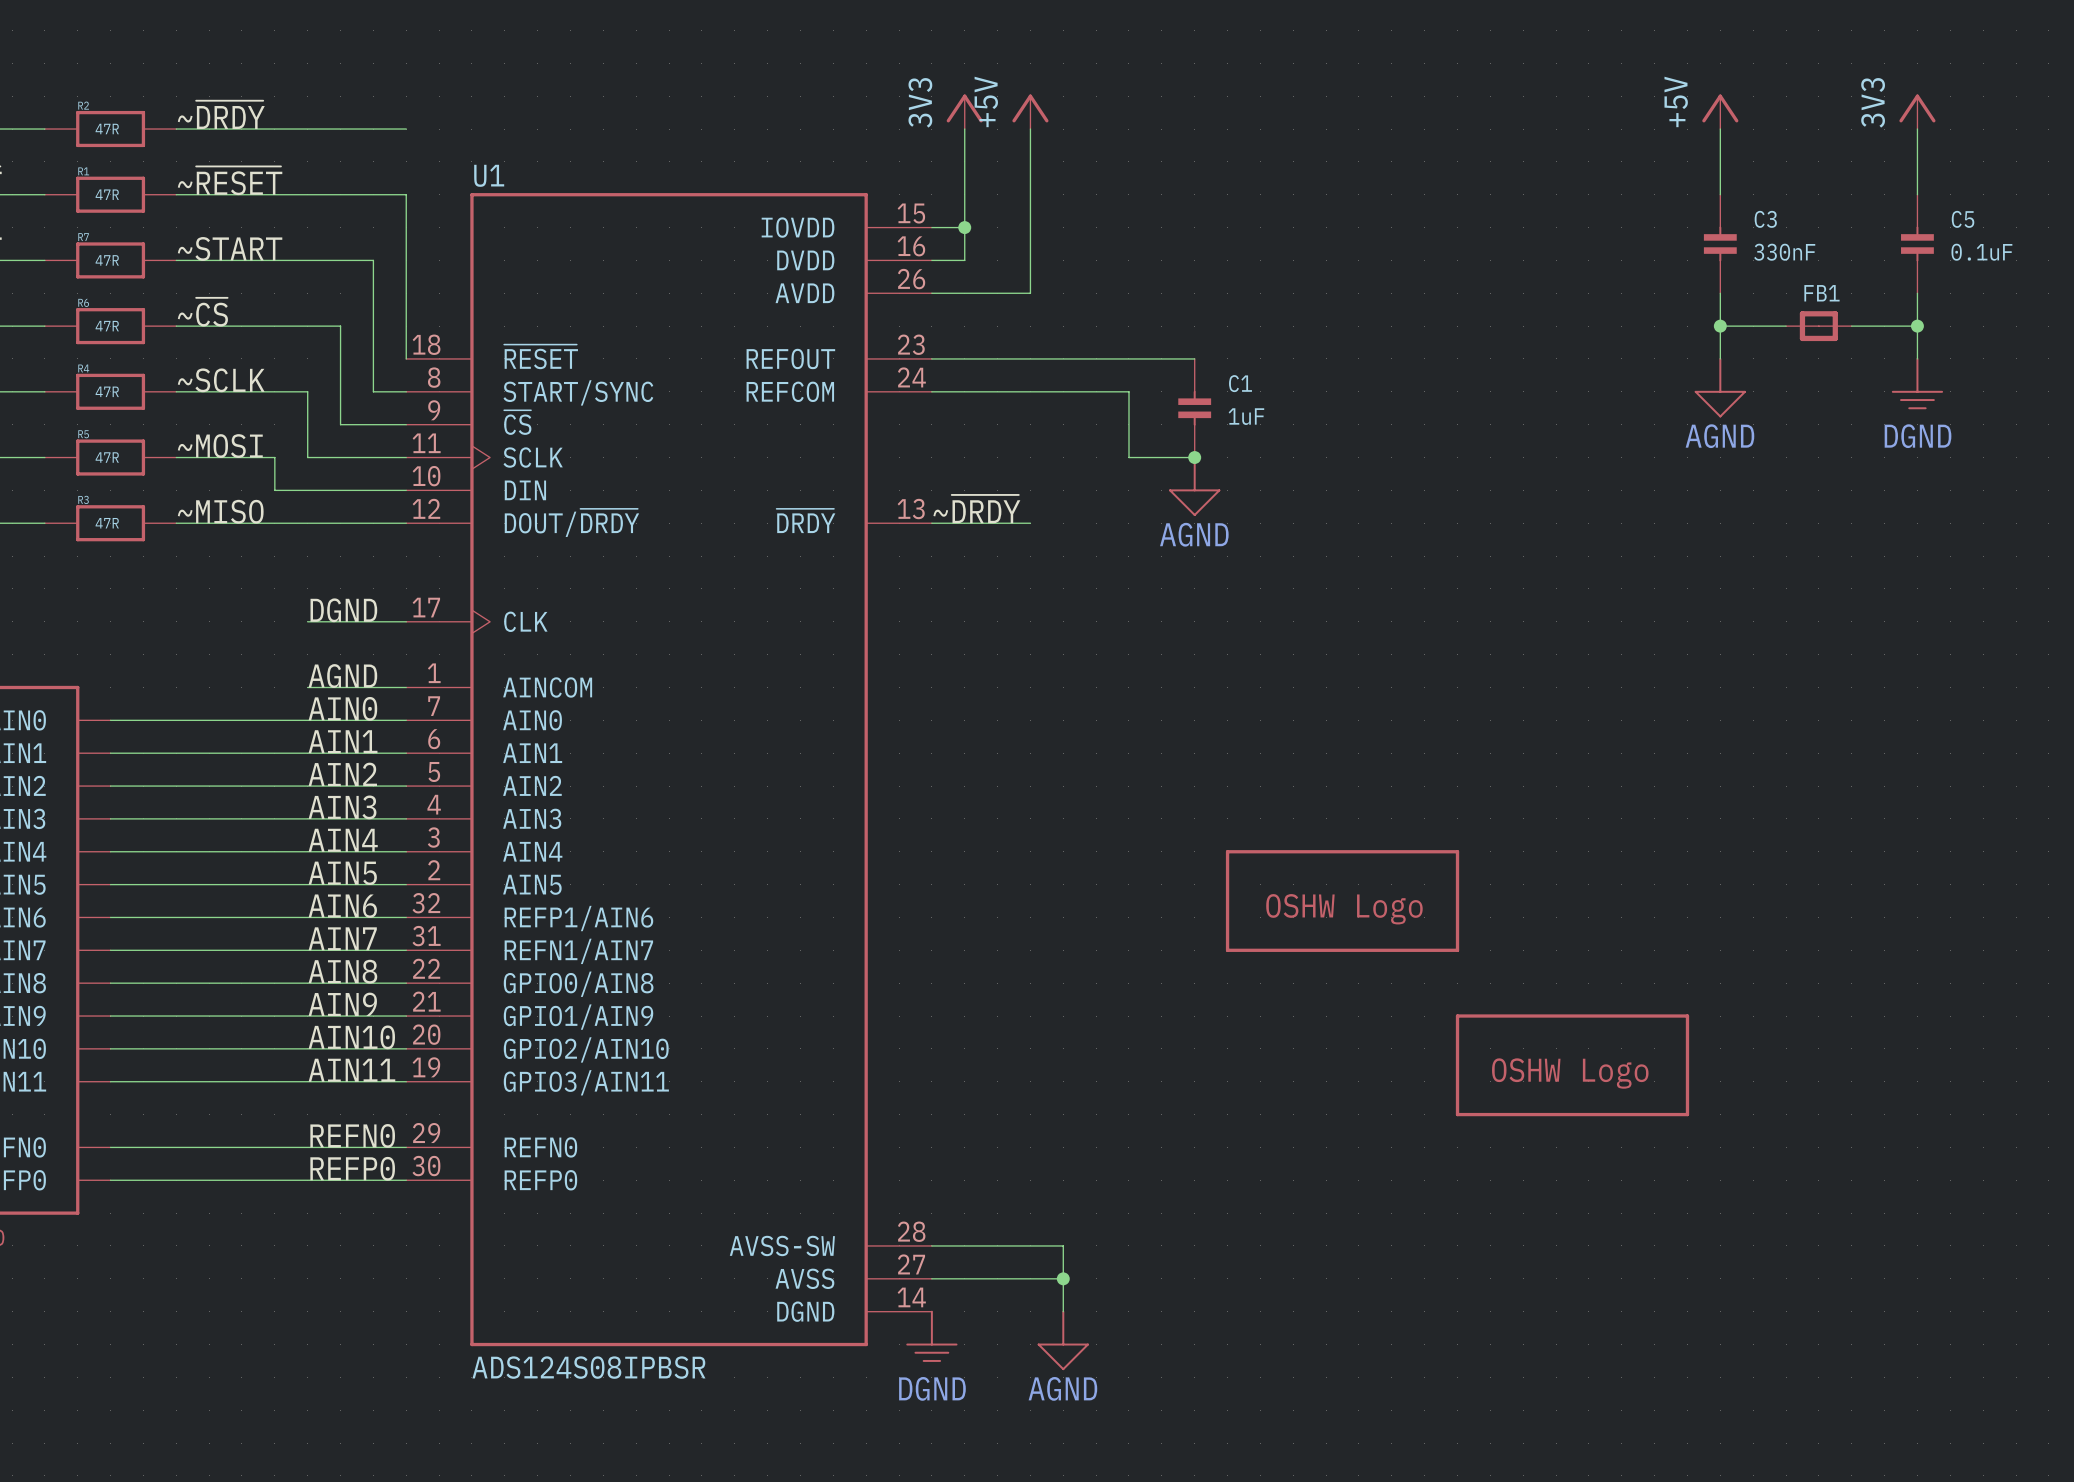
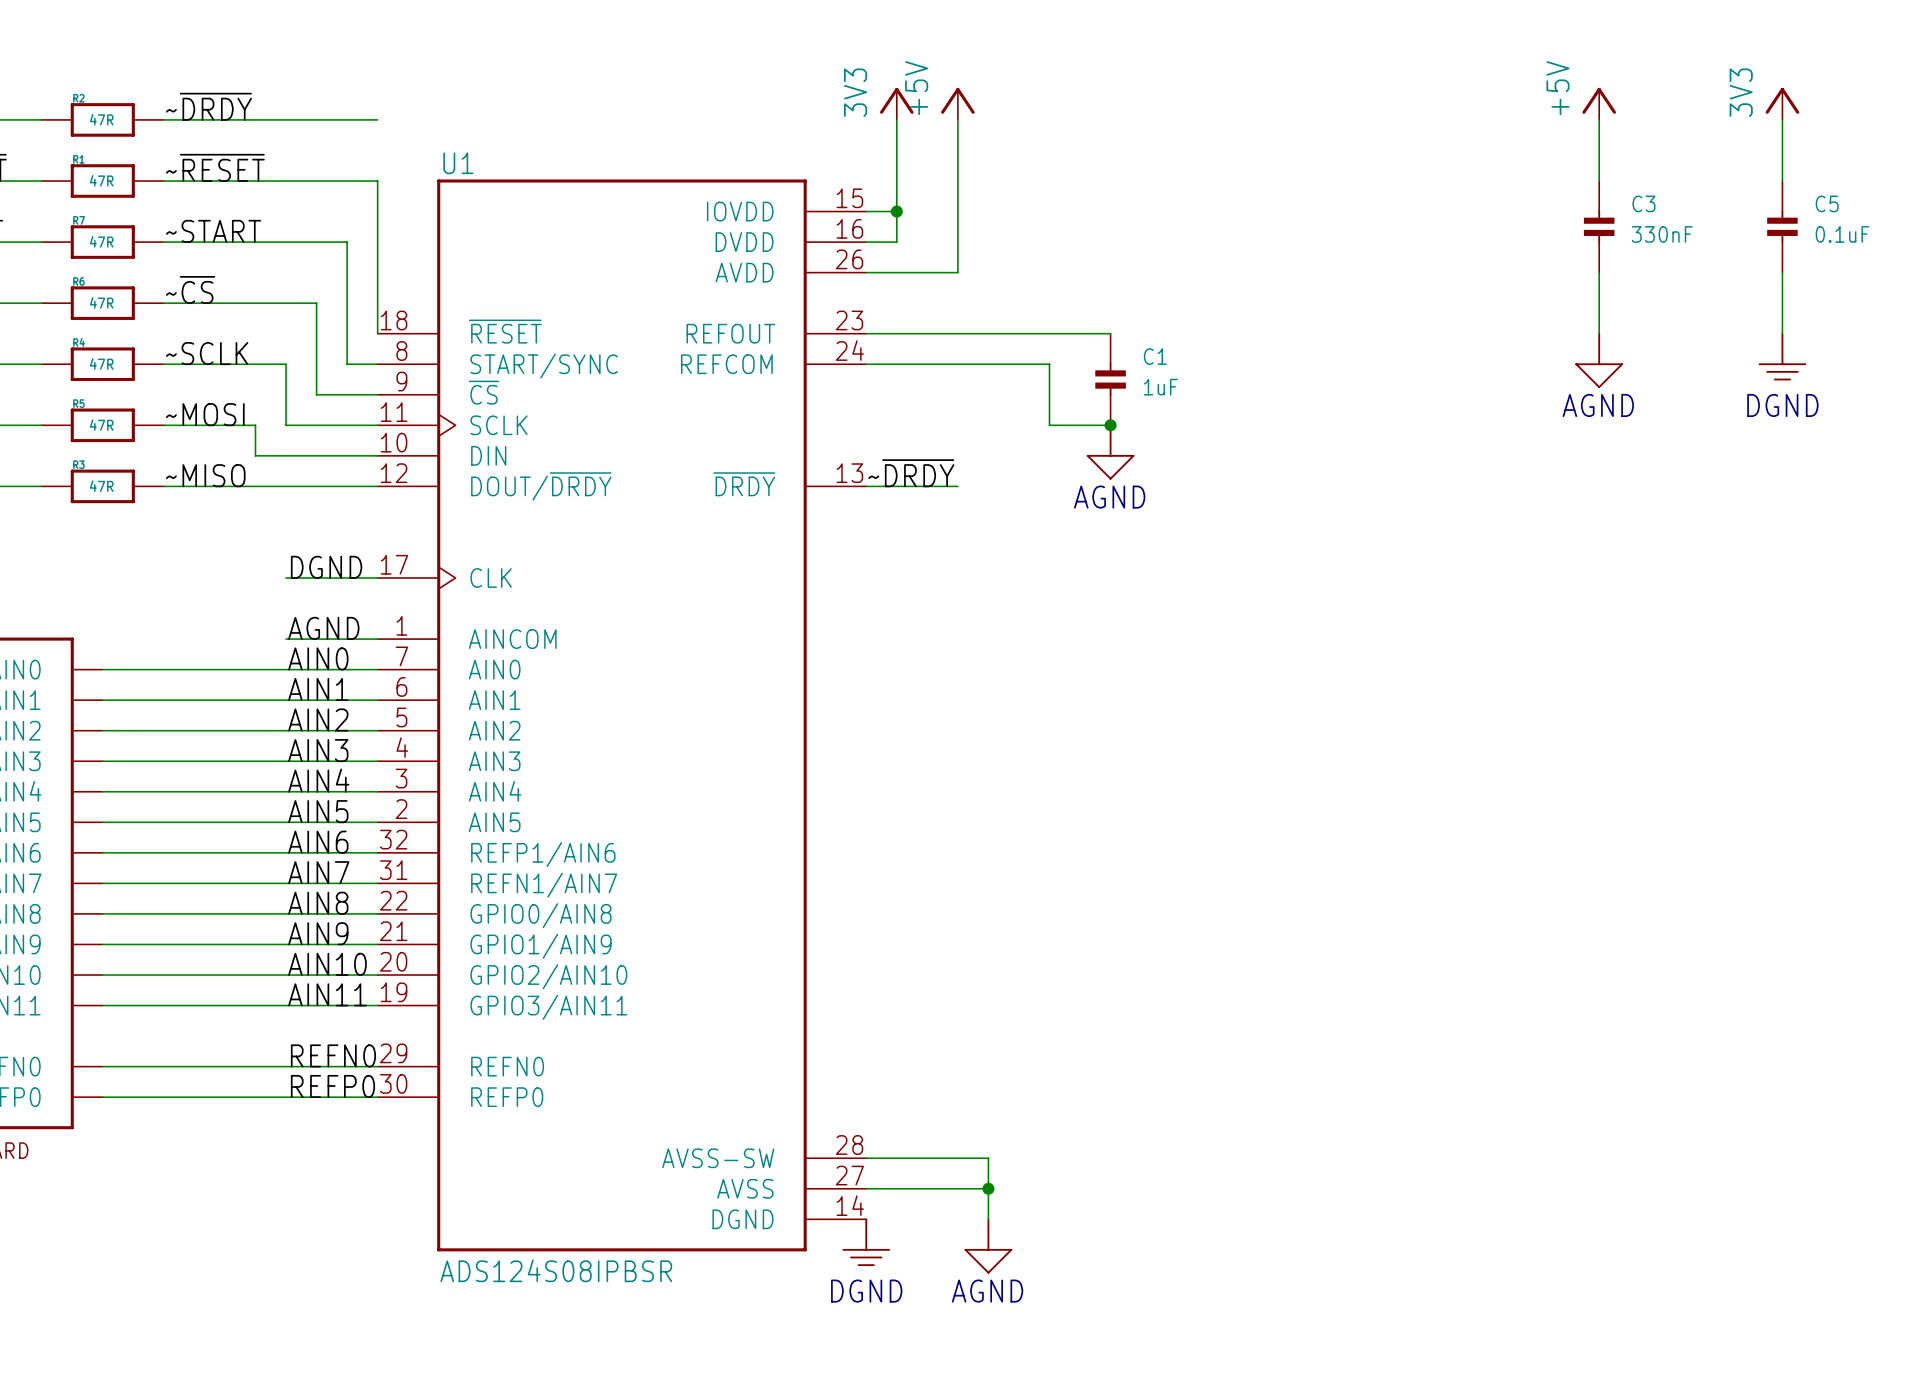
wire: (1720, 326) (1786, 326) -> none
junction: (1720, 326) -> none
FB1: (1818, 326) -> none
wire: (1851, 326) (1917, 326) -> none
junction: (1917, 326) -> none
part: (1342, 901) -> none
part: (1572, 1065) -> none

